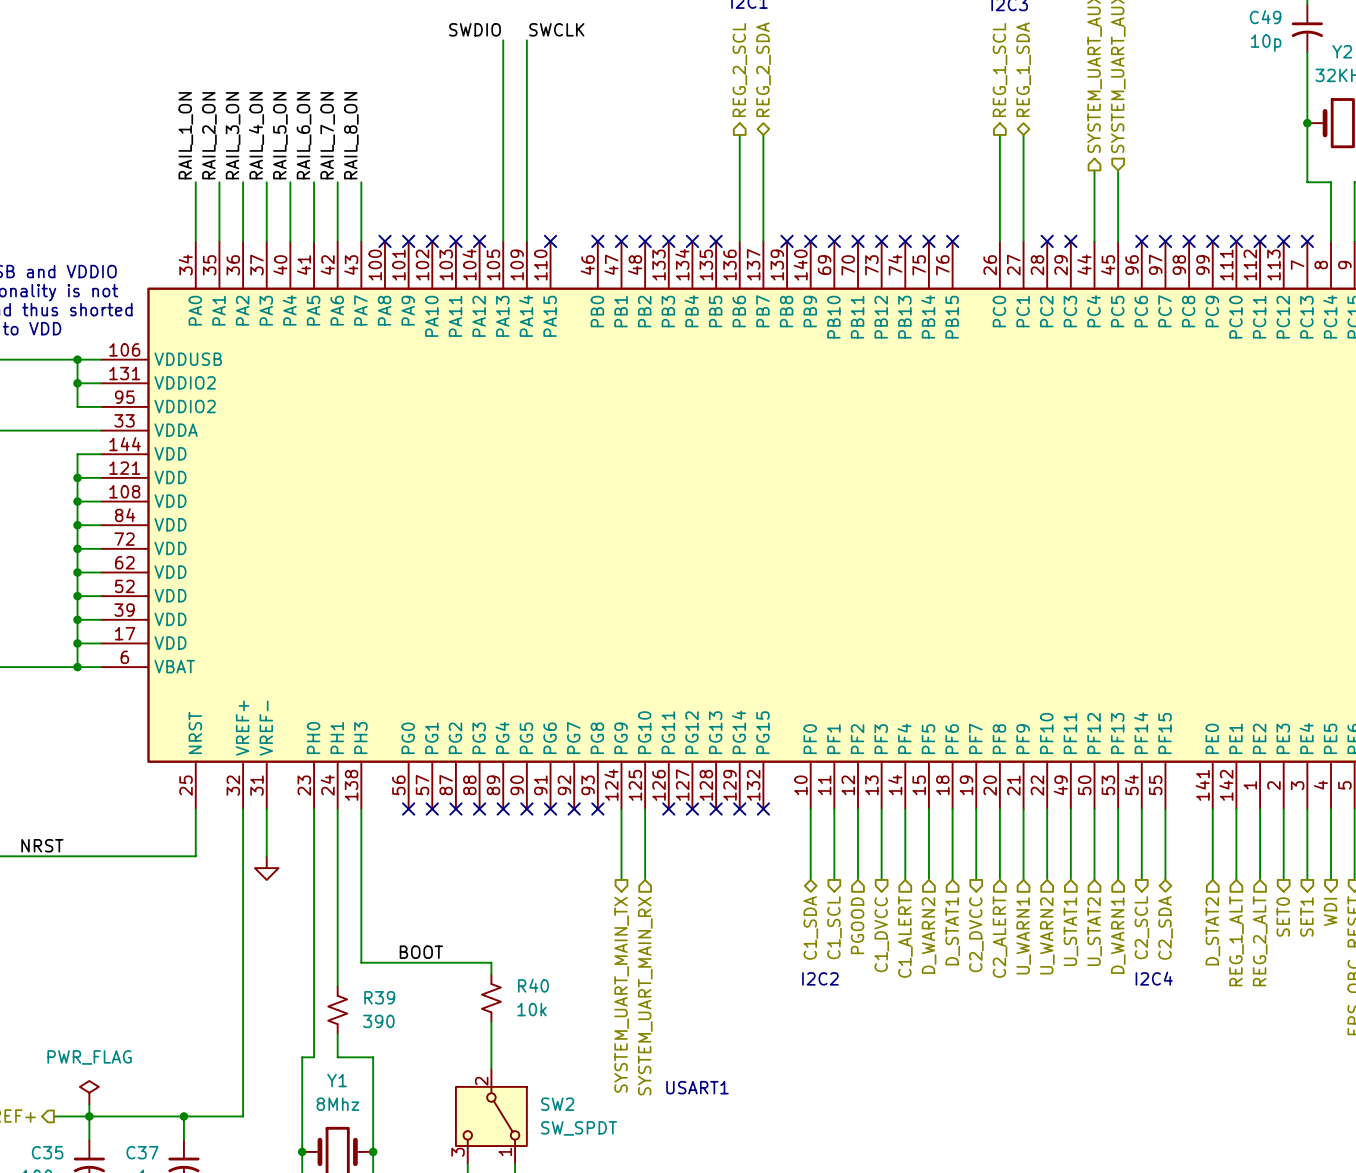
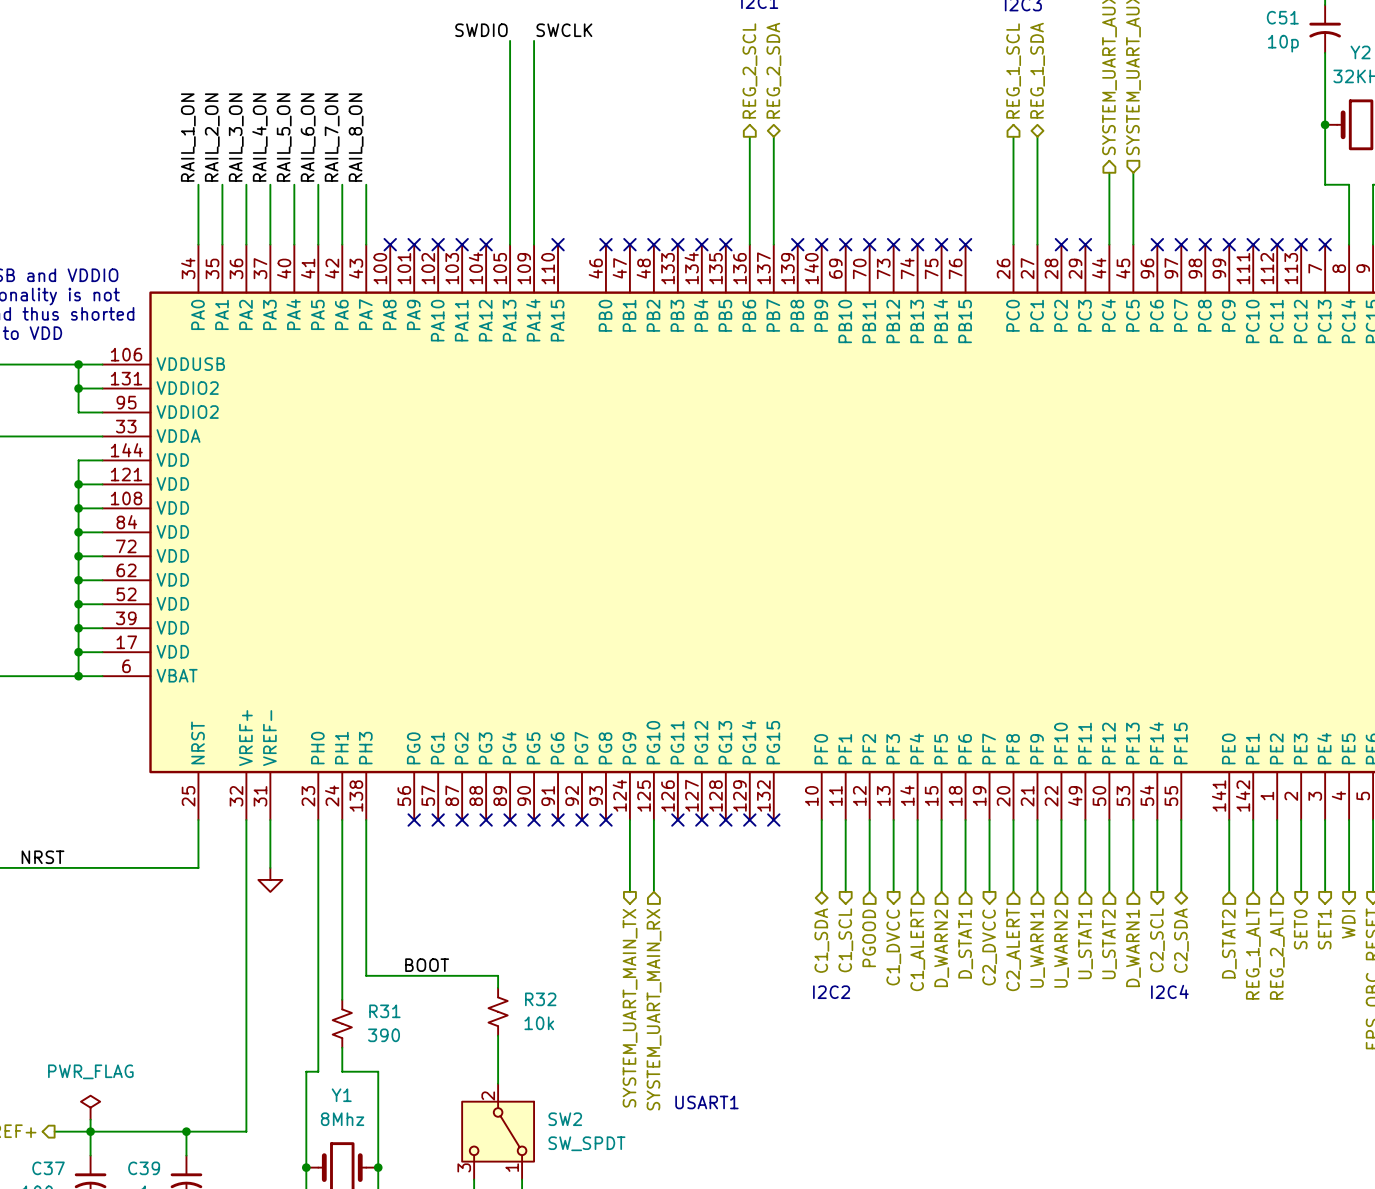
C49 name: C49 (1265, 17) -> C51 (1282, 17)
R40 name: R40 (533, 985) -> R32 (540, 999)
R39 name: R39 (379, 997) -> R31 (384, 1011)
C35 name: C35 (47, 1152) -> C37 (48, 1168)
C37 name: C37 (142, 1152) -> C39 (144, 1168)

